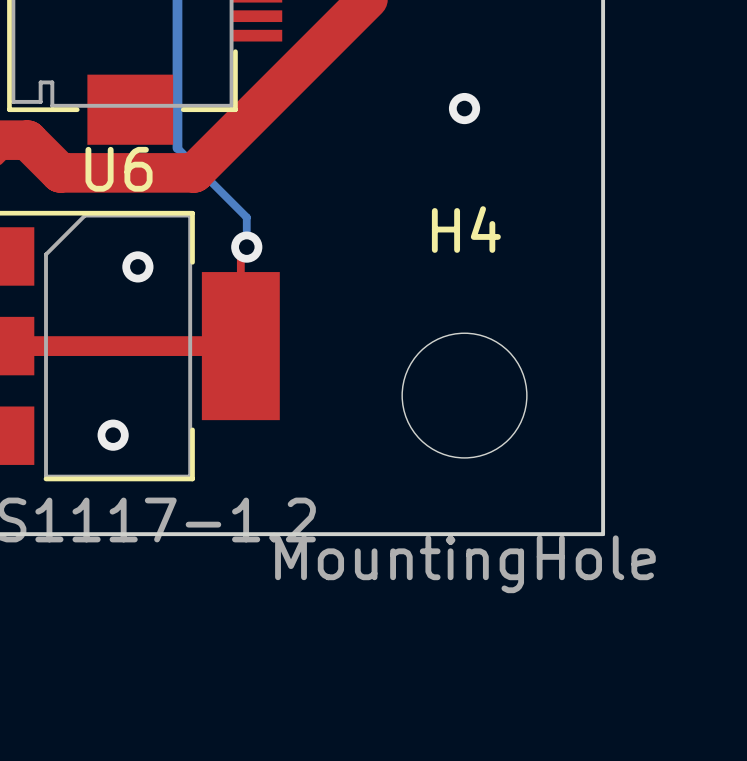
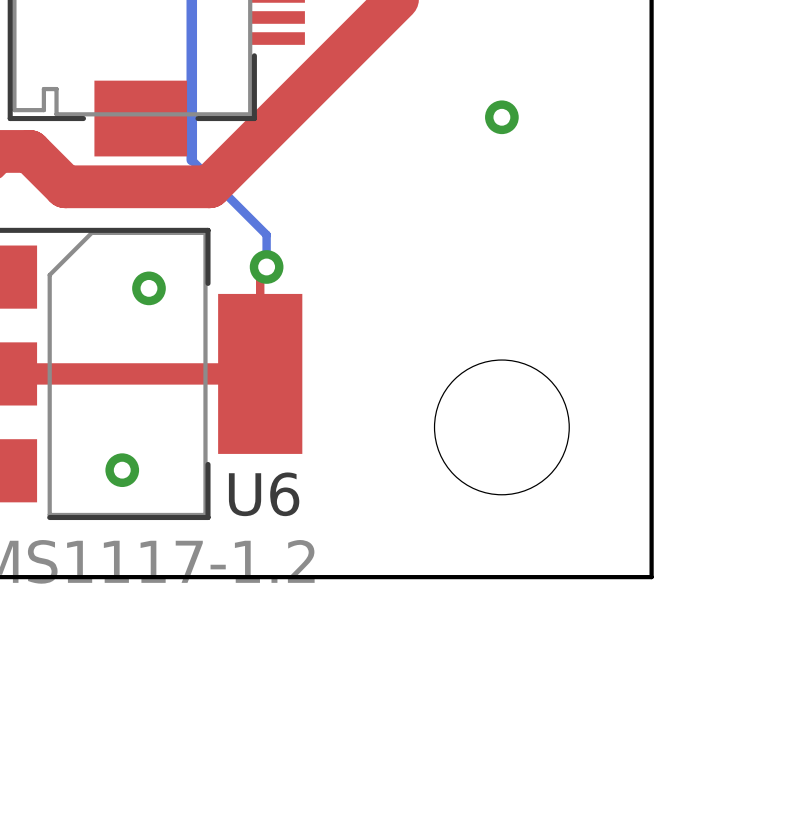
U6 name position: U6 (119, 169) -> U6 (264, 494)
H4 name: H4 (466, 229) -> none
H4 value: MountingHole (465, 564) -> none

